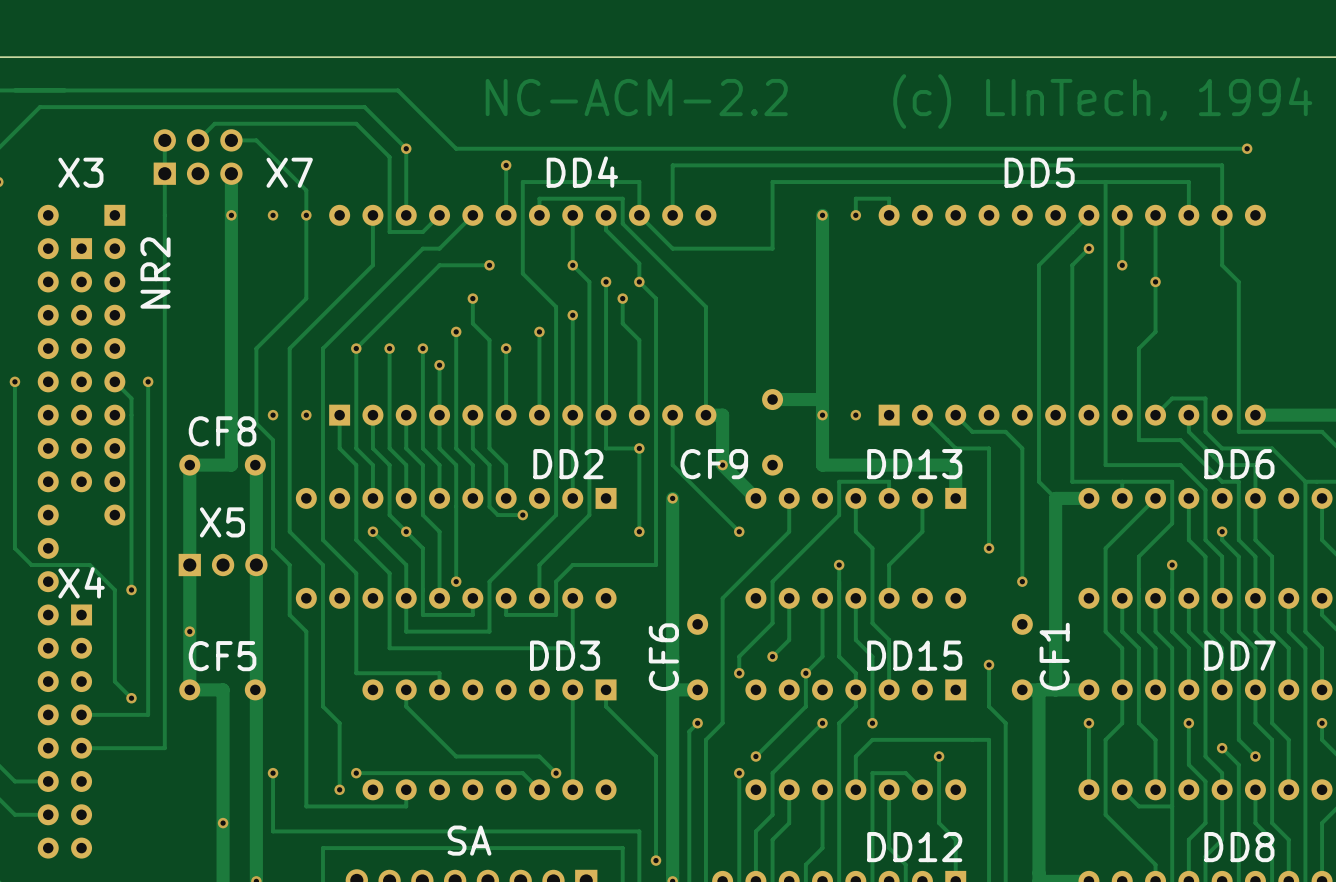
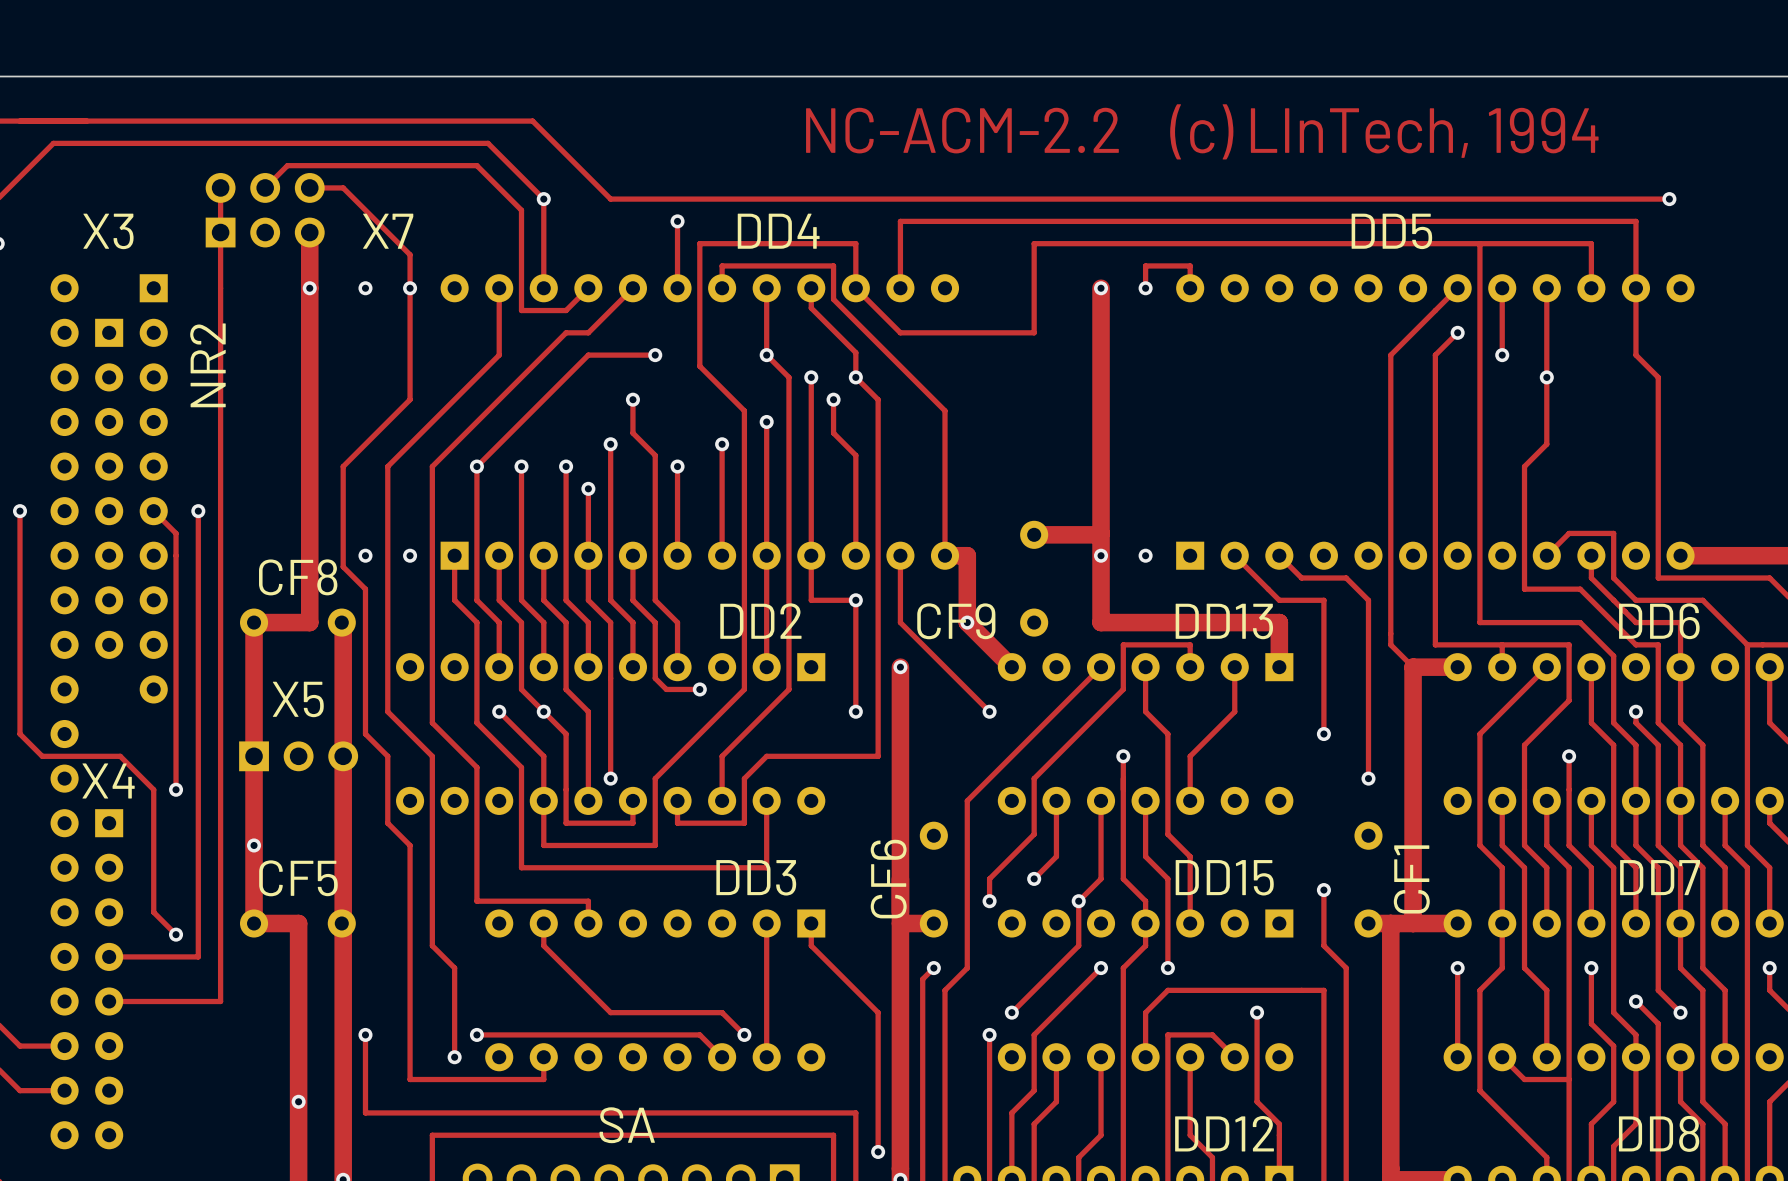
track: (789, 498) (789, 531) -> (1101, 667) (1056, 711)

